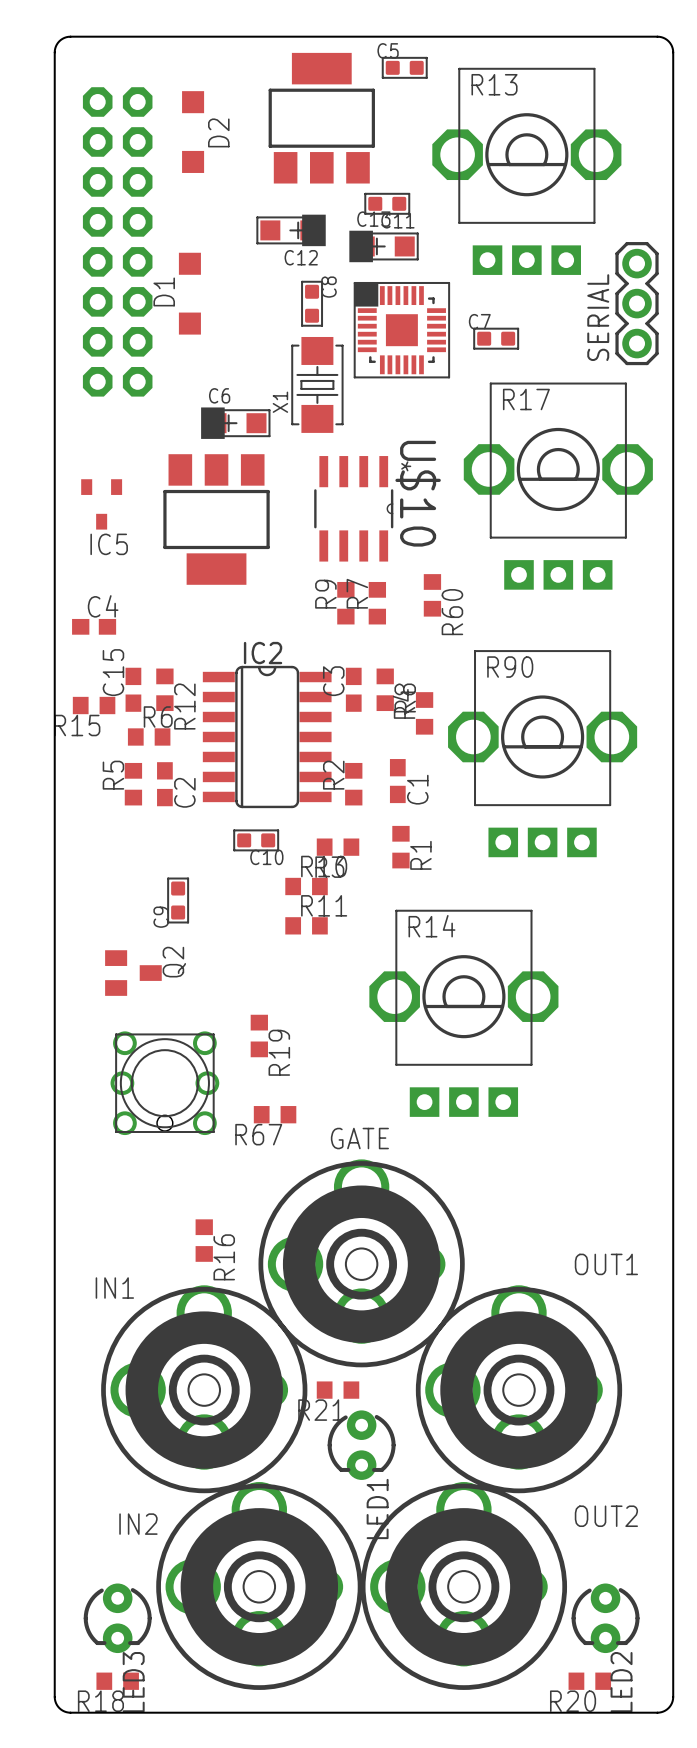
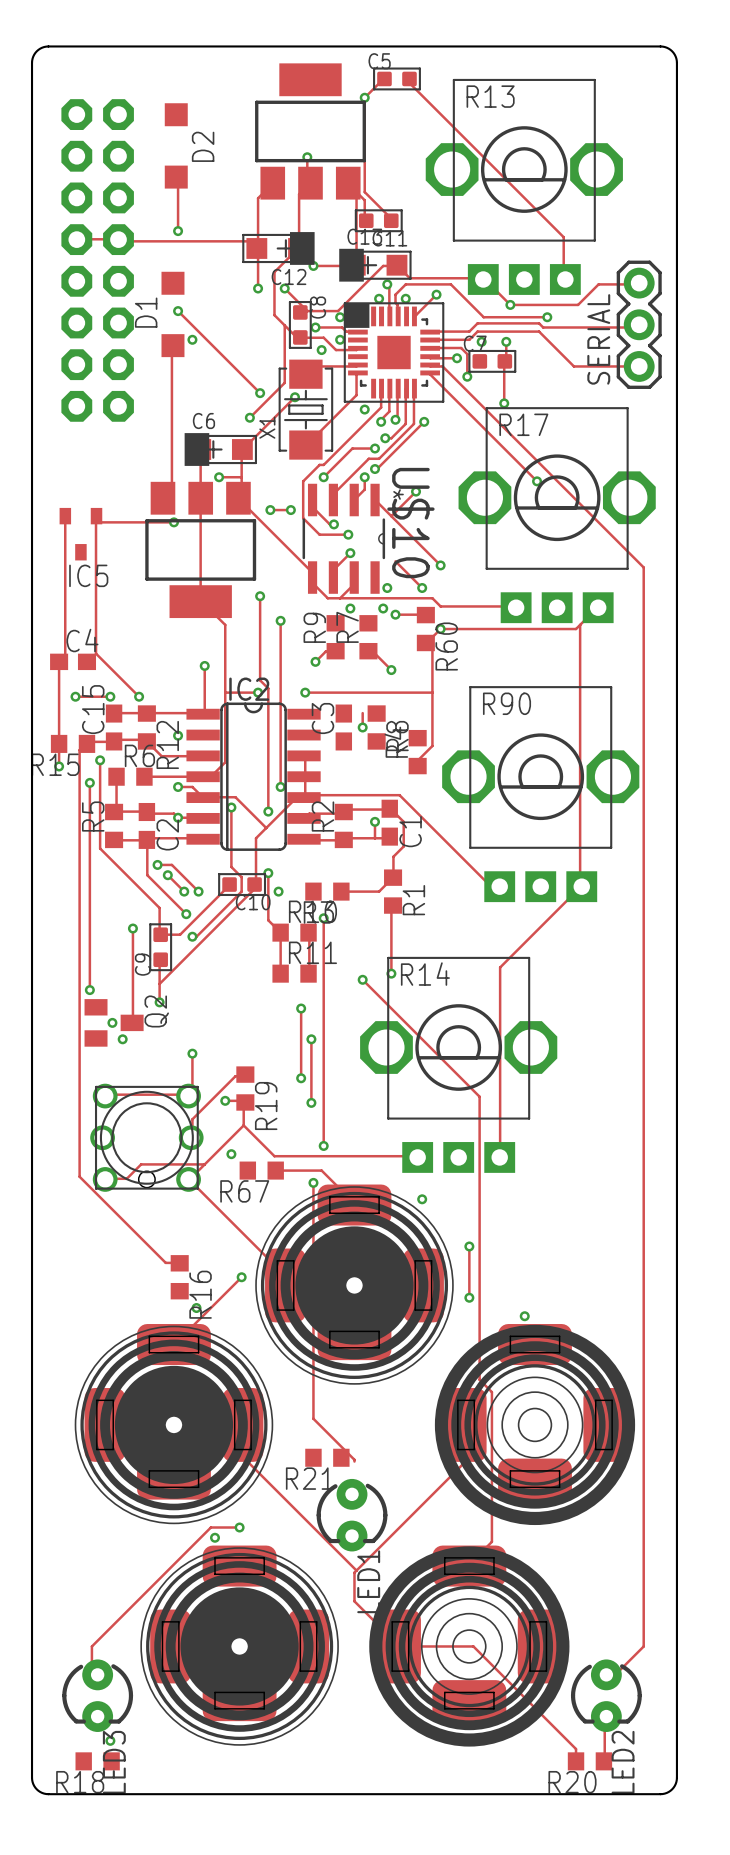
track: none -> (384, 78) (364, 97) (364, 192) (391, 220)
track: none -> (409, 78) (409, 83) (563, 237) (563, 278) (565, 279)
via: none -> (364, 97)
track: none -> (307, 157) (307, 185) (310, 183) (299, 194) (299, 247) (274, 272) (274, 315) (294, 335) (301, 337) (323, 337) (336, 350) (356, 350) (357, 348)
via: none -> (307, 157)
track: none -> (176, 177) (178, 177) (178, 231)
track: none -> (272, 183) (258, 198) (256, 248)
track: none -> (366, 220) (364, 200) (348, 183) (356, 192) (356, 263) (354, 265) (313, 265)
via: none -> (178, 231)
track: none -> (76, 239) (258, 241) (256, 248)
track: none -> (256, 248) (258, 288)
via: none -> (313, 265)
track: none -> (639, 283) (598, 284) (578, 304) (510, 304) (483, 278) (409, 278) (396, 265) (383, 265) (338, 311) (300, 312) (307, 311) (284, 288)
track: none -> (387, 284) (389, 286) (389, 316)
via: none -> (387, 284)
via: none -> (258, 288)
via: none -> (284, 288)
track: none -> (436, 294) (414, 316)
via: none -> (436, 294)
via: none -> (379, 298)
via: none -> (405, 298)
via: none -> (510, 304)
track: none -> (178, 311) (260, 393)
via: none -> (178, 311)
track: none -> (398, 316) (395, 294) (405, 284) (450, 284) (483, 317) (547, 317)
via: none -> (340, 317)
via: none -> (547, 317)
track: none -> (639, 324) (635, 327) (543, 327) (539, 323) (477, 323) (469, 331) (430, 332)
track: none -> (284, 325) (284, 382) (249, 417)
track: none -> (315, 327) (342, 327) (346, 331) (357, 332)
via: none -> (315, 327)
via: none -> (192, 339)
via: none -> (340, 339)
track: none -> (430, 339) (469, 339) (477, 331) (539, 331) (573, 366) (639, 366)
via: none -> (481, 341)
track: none -> (506, 341) (504, 403)
via: none -> (506, 341)
track: none -> (172, 345) (171, 489) (162, 498)
track: none -> (430, 348) (461, 348) (467, 354) (467, 376)
via: none -> (321, 350)
track: none -> (430, 356) (430, 358) (457, 358)
via: none -> (457, 358)
track: none -> (357, 365) (313, 366) (305, 374)
track: none -> (430, 365) (442, 366) (643, 567) (643, 1646) (617, 1674)
track: none -> (357, 372) (356, 395) (305, 445)
track: none -> (430, 372) (537, 481)
via: none -> (467, 376)
track: none -> (381, 388) (381, 407) (323, 464) (319, 464) (303, 481) (303, 518) (319, 534) (348, 534)
track: none -> (389, 388) (389, 411) (381, 421)
track: none -> (398, 388) (397, 417) (395, 419)
track: none -> (406, 388) (405, 423) (391, 438) (385, 438)
track: none -> (414, 388) (413, 423) (379, 458) (368, 458) (333, 493) (333, 500)
via: none -> (260, 393)
track: none -> (294, 397) (241, 450) (241, 495) (238, 498) (311, 571) (313, 583) (327, 598) (432, 598) (440, 606) (516, 607)
via: none -> (294, 397)
via: none -> (504, 403)
via: none -> (364, 409)
via: none -> (249, 417)
via: none -> (395, 419)
via: none -> (381, 421)
track: none -> (424, 421) (374, 469)
via: none -> (424, 421)
via: none -> (385, 438)
track: none -> (374, 448) (352, 448) (323, 477)
via: none -> (374, 448)
track: none -> (200, 449) (200, 601) (225, 624) (225, 762) (210, 776) (144, 776)
via: none -> (374, 469)
track: none -> (219, 477) (241, 477)
via: none -> (219, 477)
via: none -> (323, 477)
track: none -> (364, 477) (364, 489) (354, 499)
via: none -> (364, 477)
via: none -> (537, 481)
track: none -> (416, 491) (391, 516)
via: none -> (416, 491)
track: none -> (312, 500) (313, 508) (329, 524) (333, 524)
track: none -> (375, 500) (440, 565)
track: none -> (270, 510) (290, 510)
via: none -> (270, 510)
via: none -> (290, 510)
track: none -> (65, 516) (65, 655) (59, 661) (59, 766)
track: none -> (173, 522) (96, 522) (96, 516) (96, 516) (96, 653) (139, 696)
via: none -> (173, 522)
via: none -> (333, 524)
via: none -> (348, 534)
track: none -> (350, 553) (333, 569) (333, 577)
via: none -> (350, 553)
track: none -> (395, 561) (422, 588)
via: none -> (440, 565)
track: none -> (354, 577) (352, 577) (352, 585) (340, 598)
via: none -> (387, 588)
via: none -> (422, 588)
track: none -> (260, 596) (260, 680) (268, 688) (268, 811)
via: none -> (260, 596)
track: none -> (598, 607) (576, 629) (440, 629) (426, 643)
via: none -> (350, 608)
via: none -> (383, 608)
track: none -> (395, 614) (425, 615)
via: none -> (395, 614)
track: none -> (280, 620) (280, 786)
via: none -> (280, 620)
track: none -> (580, 624) (580, 885) (581, 886) (500, 967) (499, 1157)
via: none -> (440, 629)
track: none -> (425, 642) (432, 649) (432, 745) (418, 760) (417, 766)
track: none -> (335, 651) (325, 651) (315, 661)
track: none -> (368, 651) (372, 651) (391, 670)
via: none -> (315, 661)
track: none -> (204, 665) (204, 713) (203, 714) (114, 713)
via: none -> (204, 665)
via: none -> (391, 670)
track: none -> (225, 692) (258, 692)
via: none -> (258, 692)
track: none -> (305, 692) (432, 692)
via: none -> (305, 692)
track: none -> (75, 696) (110, 696)
via: none -> (75, 696)
via: none -> (110, 696)
via: none -> (139, 696)
track: none -> (362, 713) (362, 727)
via: none -> (362, 727)
via: none -> (178, 735)
track: none -> (203, 755) (161, 756) (145, 739) (89, 741) (79, 750) (79, 1176) (165, 1262) (179, 1263)
track: none -> (303, 755) (303, 797)
track: none -> (100, 760) (100, 848) (159, 908) (159, 934) (180, 934) (229, 884)
via: none -> (100, 760)
via: none -> (59, 766)
track: none -> (116, 776) (116, 811) (114, 812) (173, 813) (178, 817) (203, 818)
track: none -> (89, 782) (89, 990)
via: none -> (89, 782)
track: none -> (178, 786) (192, 786) (203, 797) (235, 797) (266, 828)
via: none -> (178, 786)
via: none -> (280, 786)
track: none -> (303, 797) (303, 799) (294, 799) (256, 838) (256, 883) (253, 889) (159, 983)
track: none -> (303, 797) (305, 795) (399, 795) (489, 885) (499, 886)
track: none -> (231, 807) (231, 866) (241, 877) (241, 891) (196, 936) (192, 936)
via: none -> (231, 807)
via: none -> (268, 811)
via: none -> (178, 817)
track: none -> (303, 818) (309, 813) (342, 813) (346, 809) (389, 808) (403, 821) (403, 846) (393, 856) (393, 877) (379, 891) (341, 891)
track: none -> (374, 821) (374, 838)
via: none -> (374, 821)
track: none -> (389, 836) (389, 838) (344, 838) (342, 840) (303, 839)
track: none -> (203, 839) (147, 838) (146, 839)
track: none -> (114, 839) (146, 839)
track: none -> (146, 839) (147, 875) (186, 914)
track: none -> (157, 864) (171, 864) (198, 891)
via: none -> (157, 864)
track: none -> (268, 873) (268, 920) (280, 932) (280, 973)
via: none -> (268, 873)
track: none -> (167, 875) (184, 891)
via: none -> (167, 875)
via: none -> (184, 891)
via: none -> (198, 891)
via: none -> (278, 891)
track: none -> (393, 905) (391, 905) (391, 973)
via: none -> (186, 914)
track: none -> (323, 918) (323, 1145)
via: none -> (323, 918)
track: none -> (132, 928) (132, 1022)
via: none -> (132, 928)
track: none -> (308, 932) (308, 973)
via: none -> (192, 936)
track: none -> (160, 959) (159, 1002)
via: none -> (391, 973)
track: none -> (362, 979) (479, 1096) (479, 1379) (491, 1392) (491, 1541) (469, 1566)
via: none -> (362, 979)
via: none -> (89, 990)
via: none -> (159, 1002)
track: none -> (301, 1008) (301, 1078)
via: none -> (301, 1008)
via: none -> (112, 1022)
via: none -> (122, 1039)
track: none -> (311, 1039) (311, 1102)
via: none -> (311, 1039)
track: none -> (192, 1053) (192, 1092) (188, 1096) (105, 1096)
via: none -> (192, 1053)
track: none -> (245, 1074) (235, 1076) (192, 1119) (191, 1137)
via: none -> (301, 1078)
track: none -> (225, 1100) (243, 1100) (245, 1102) (243, 1102) (243, 1125)
via: none -> (225, 1100)
via: none -> (311, 1102)
track: none -> (243, 1125) (188, 1179) (284, 1275) (285, 1285)
track: none -> (243, 1125) (274, 1156) (417, 1157)
via: none -> (323, 1145)
via: none -> (231, 1154)
track: none -> (204, 1164) (141, 1164) (126, 1178) (105, 1179)
track: none -> (275, 1170) (321, 1170) (354, 1205)
track: none -> (313, 1182) (313, 1418) (354, 1461)
via: none -> (313, 1182)
via: none -> (422, 1199)
track: none -> (469, 1246) (469, 1297)
via: none -> (469, 1246)
track: none -> (241, 1277) (173, 1344)
via: none -> (241, 1277)
part: none -> (354, 1284)
via: none -> (469, 1297)
R16 position: (204, 1240) -> (179, 1277)
via: none -> (196, 1308)
via: none -> (524, 1316)
GATE: (361, 1263) -> none
part: none -> (173, 1424)
track: none -> (210, 1424) (356, 1570)
track: none -> (466, 1424) (465, 1461) (354, 1572) (354, 1601) (399, 1646) (473, 1646) (576, 1749) (576, 1761)
part: none -> (535, 1424)
IN1: (204, 1389) -> none
OUT1: (518, 1389) -> none
track: none -> (239, 1527) (210, 1527) (91, 1646) (91, 1674)
via: none -> (239, 1527)
via: none -> (214, 1537)
part: none -> (239, 1645)
part: none -> (469, 1646)
IN2: (259, 1585) -> none
OUT2: (463, 1585) -> none
track: none -> (617, 1716) (604, 1730) (603, 1761)
via: none -> (110, 1740)

